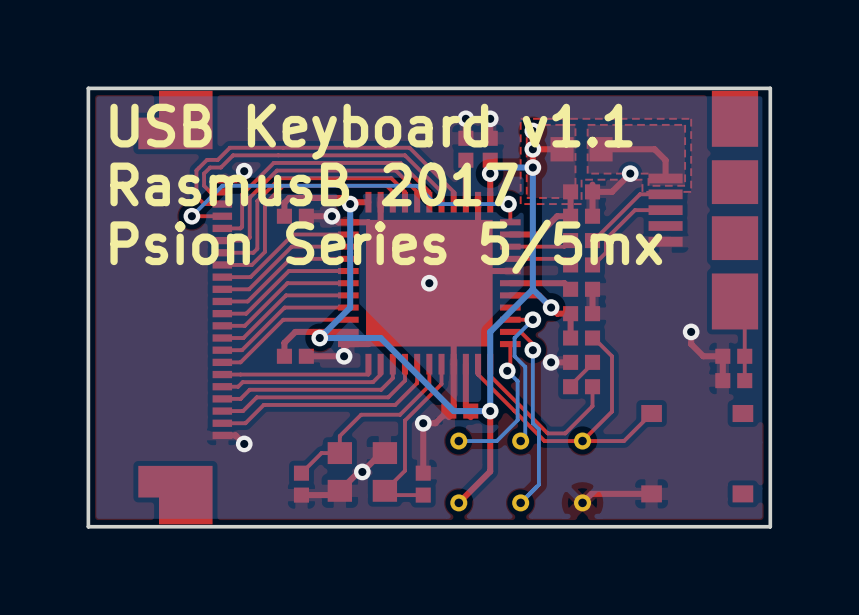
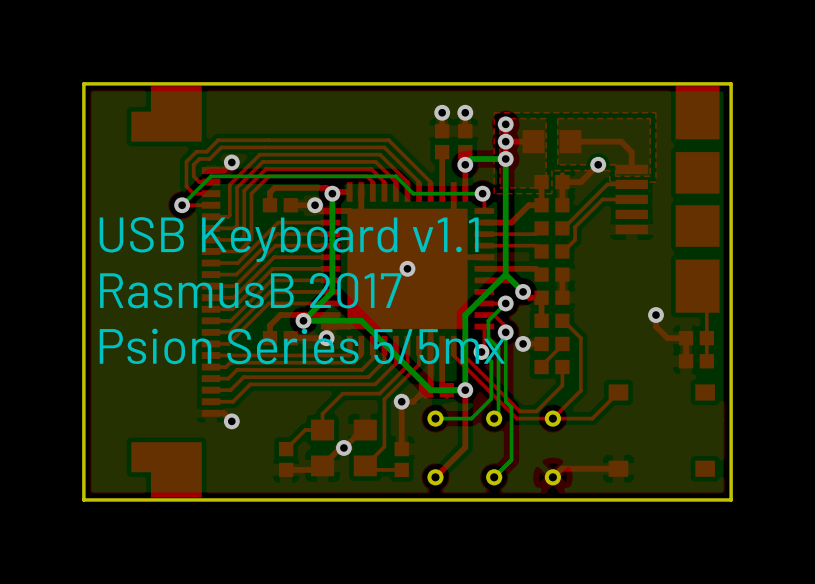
text position: USB Keyboard v1.1 (371, 131) -> USB Keyboard v1.1 (289, 239)
text position: RasmusB 2017 (314, 184) -> RasmusB 2017 (250, 290)
text position: Psion Series 5/5mx (386, 246) -> Psion Series 5/5mx (302, 346)

